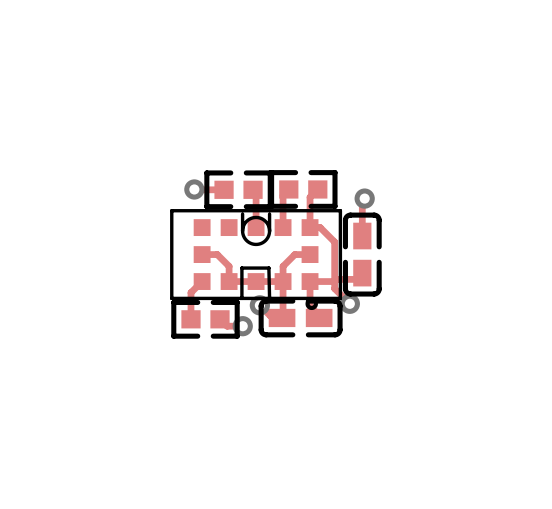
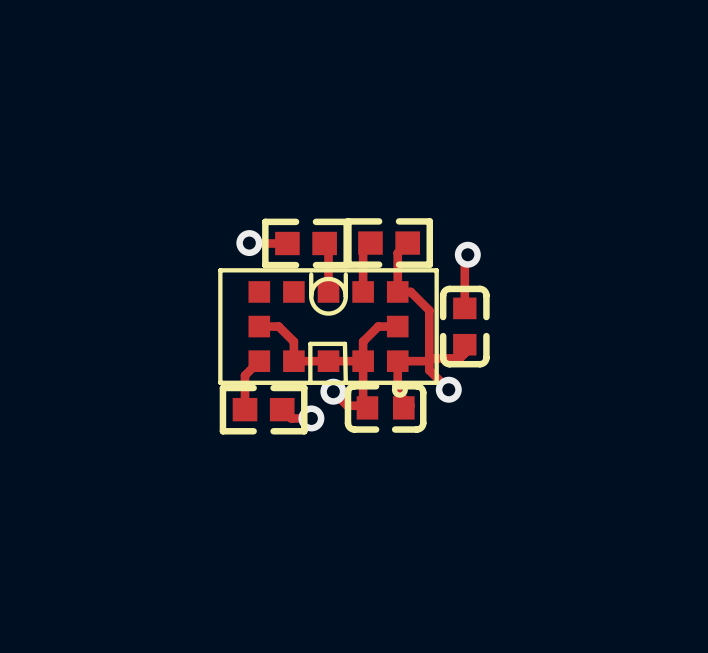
part footprint: [342, 212, 382, 297] -> [439, 285, 490, 368]
part footprint: [258, 298, 343, 338] -> [344, 383, 427, 433]

